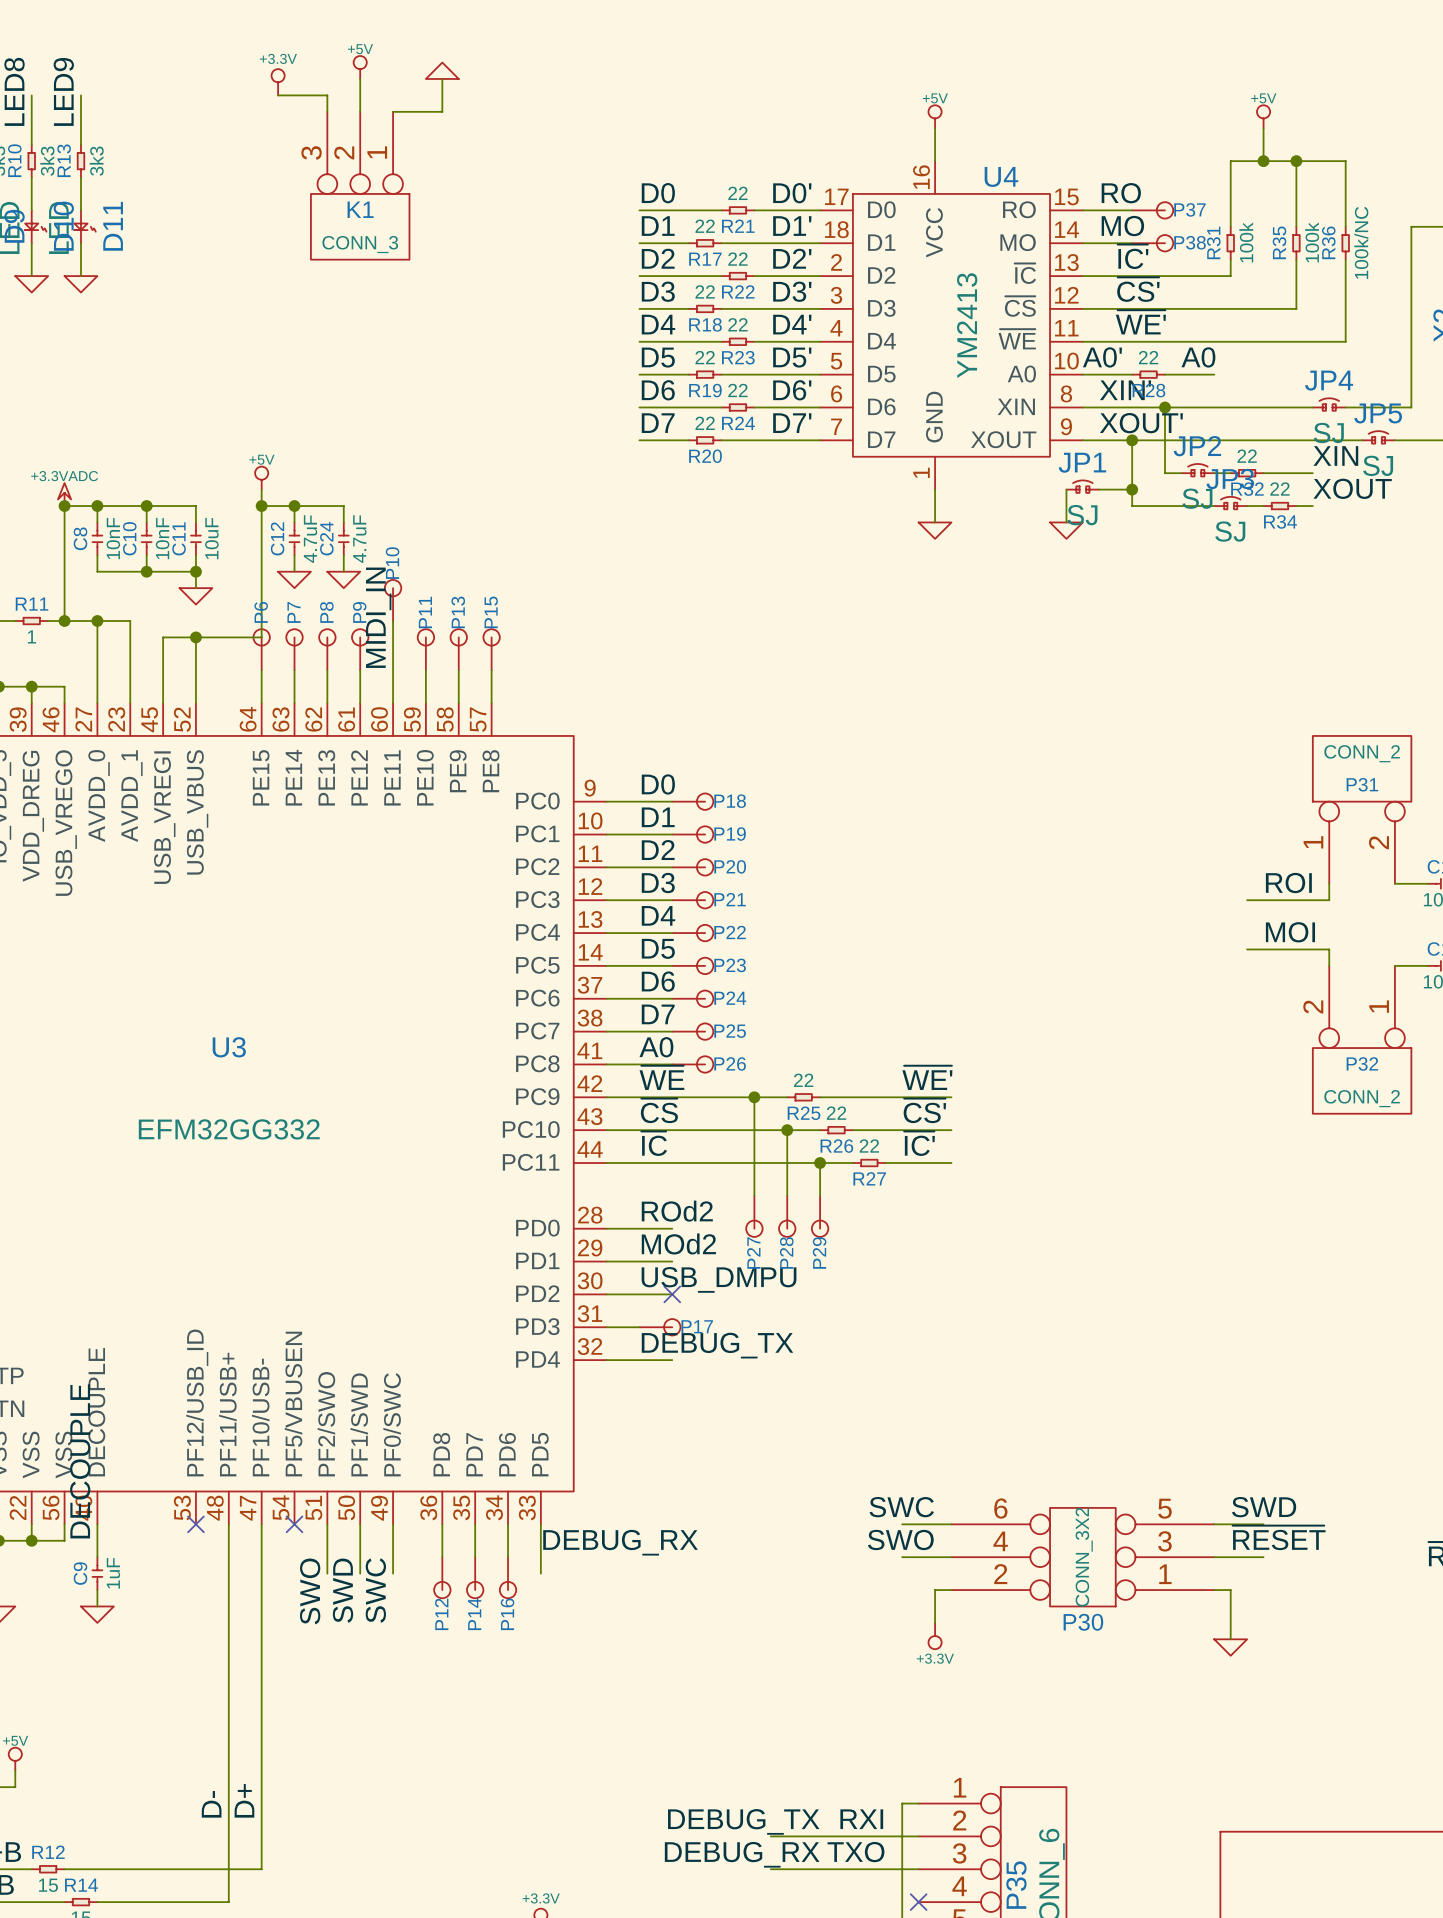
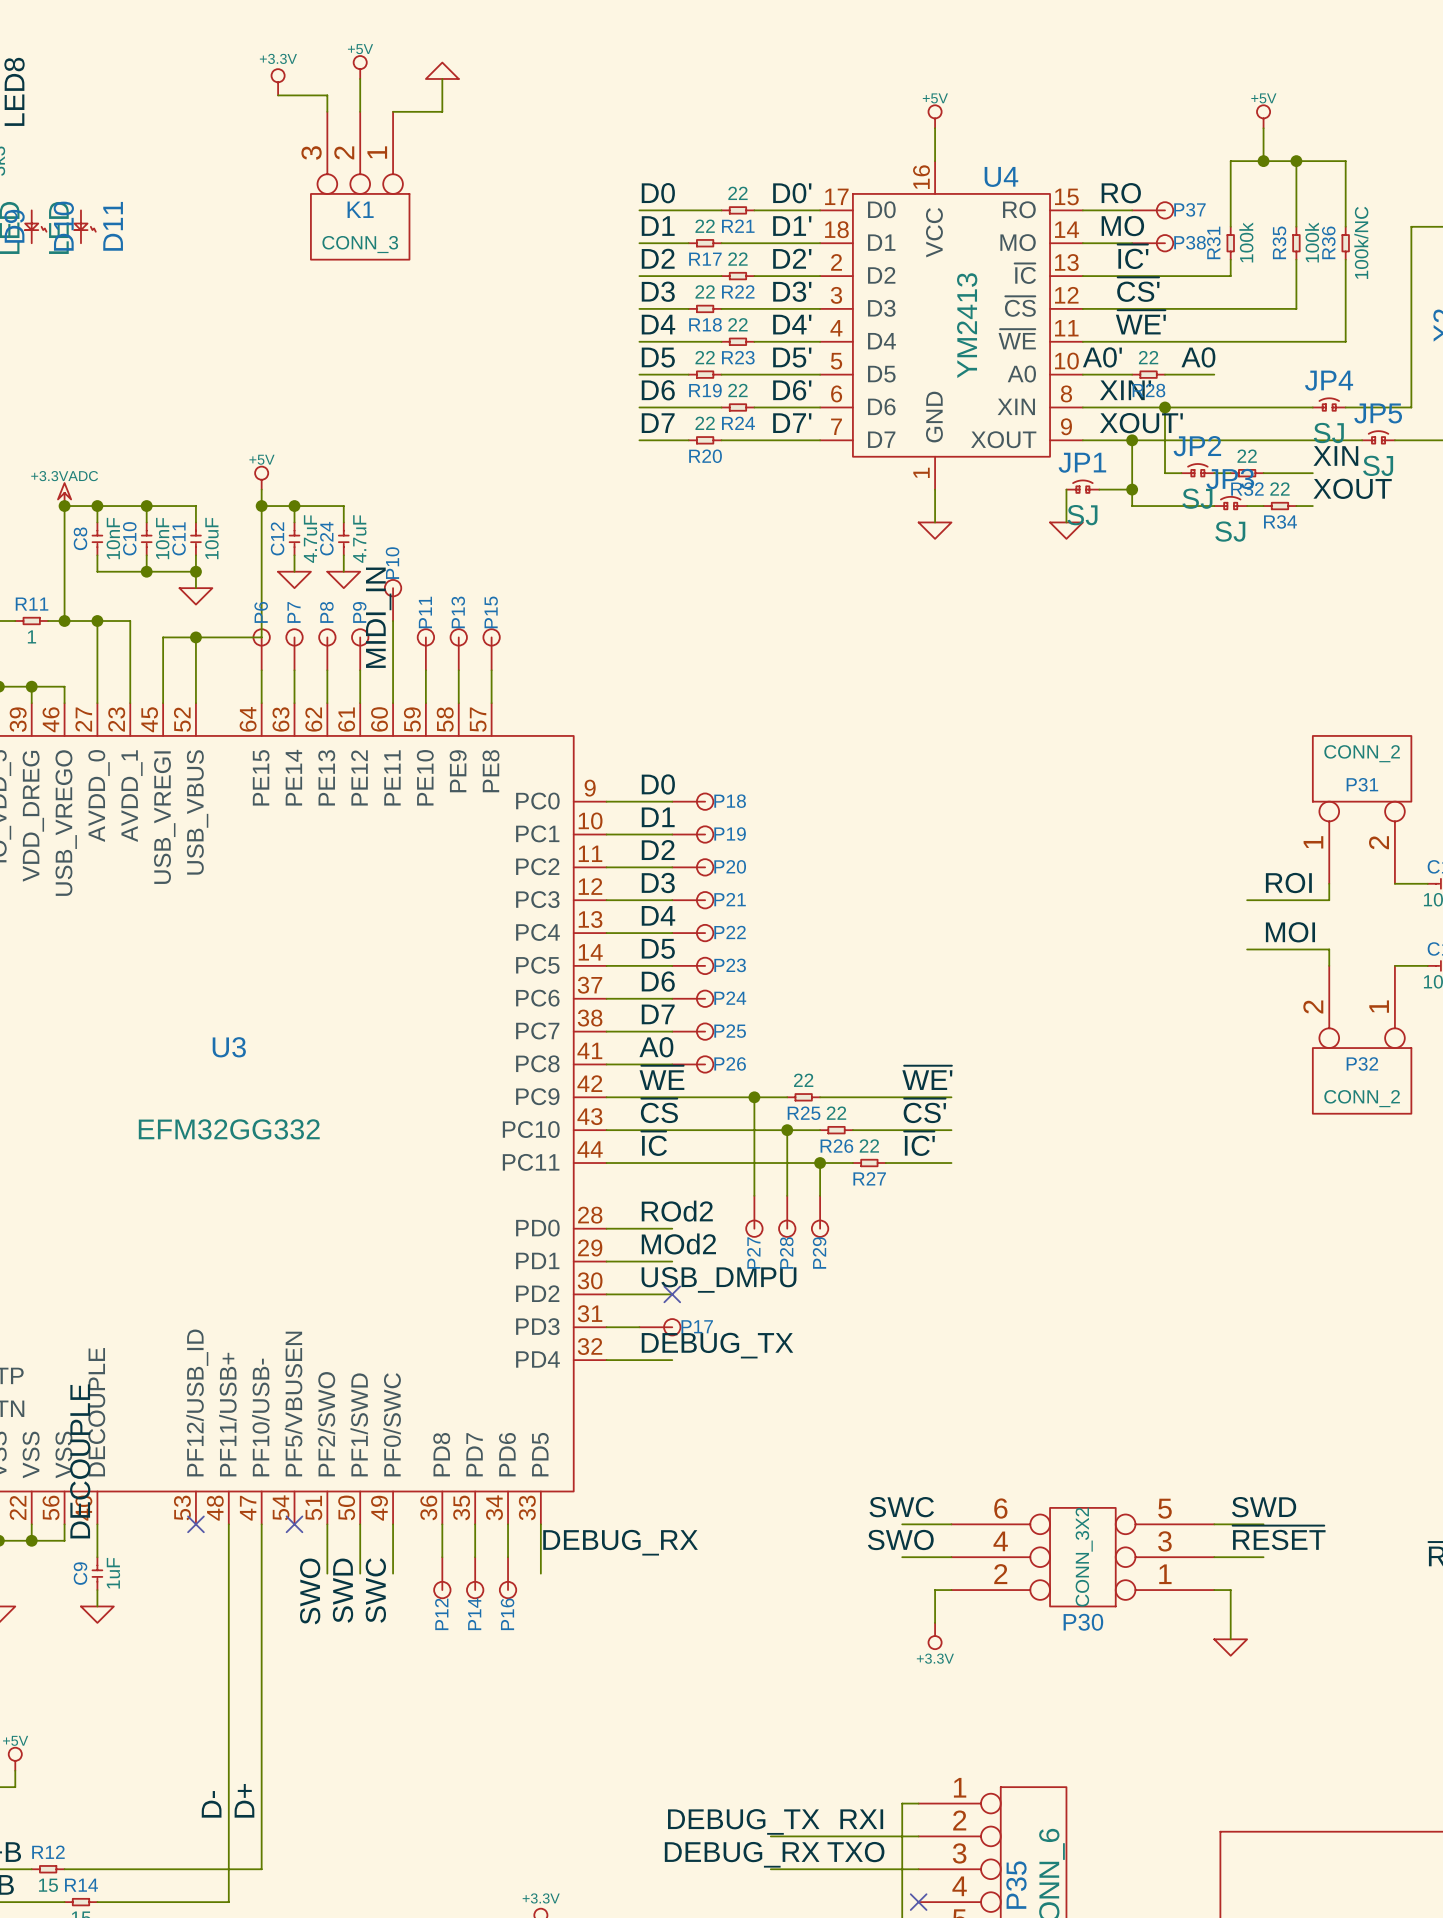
label: LED9 (63, 91) -> none
wire: (31, 95) (31, 144) -> none
wire: (80, 95) (80, 144) -> none
R10: 3k3 (31, 161) -> none
R13: 3k3 (80, 161) -> none
wire: (31, 177) (31, 210) -> none
wire: (80, 177) (80, 210) -> none
wire: (31, 243) (31, 276) -> none
wire: (80, 243) (80, 276) -> none
power symbol: (31, 284) -> none
power symbol: (80, 284) -> none

